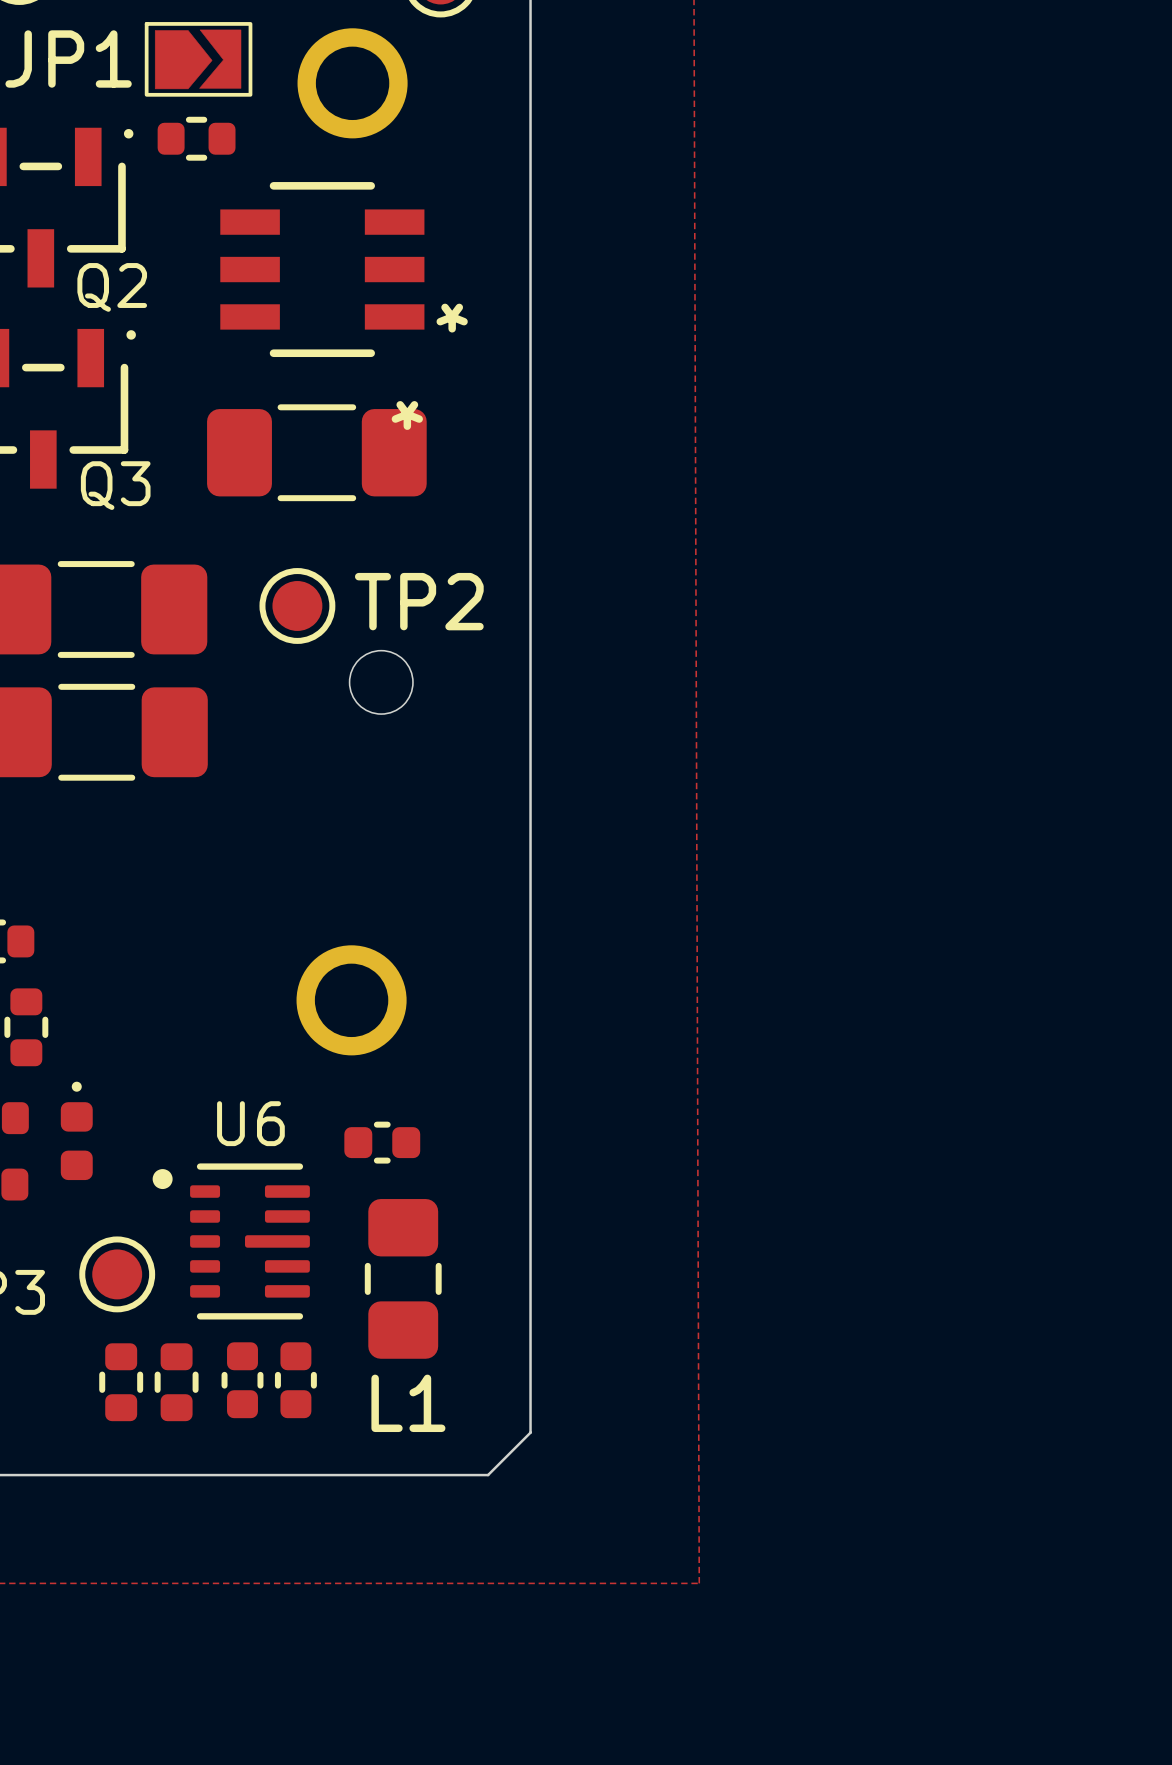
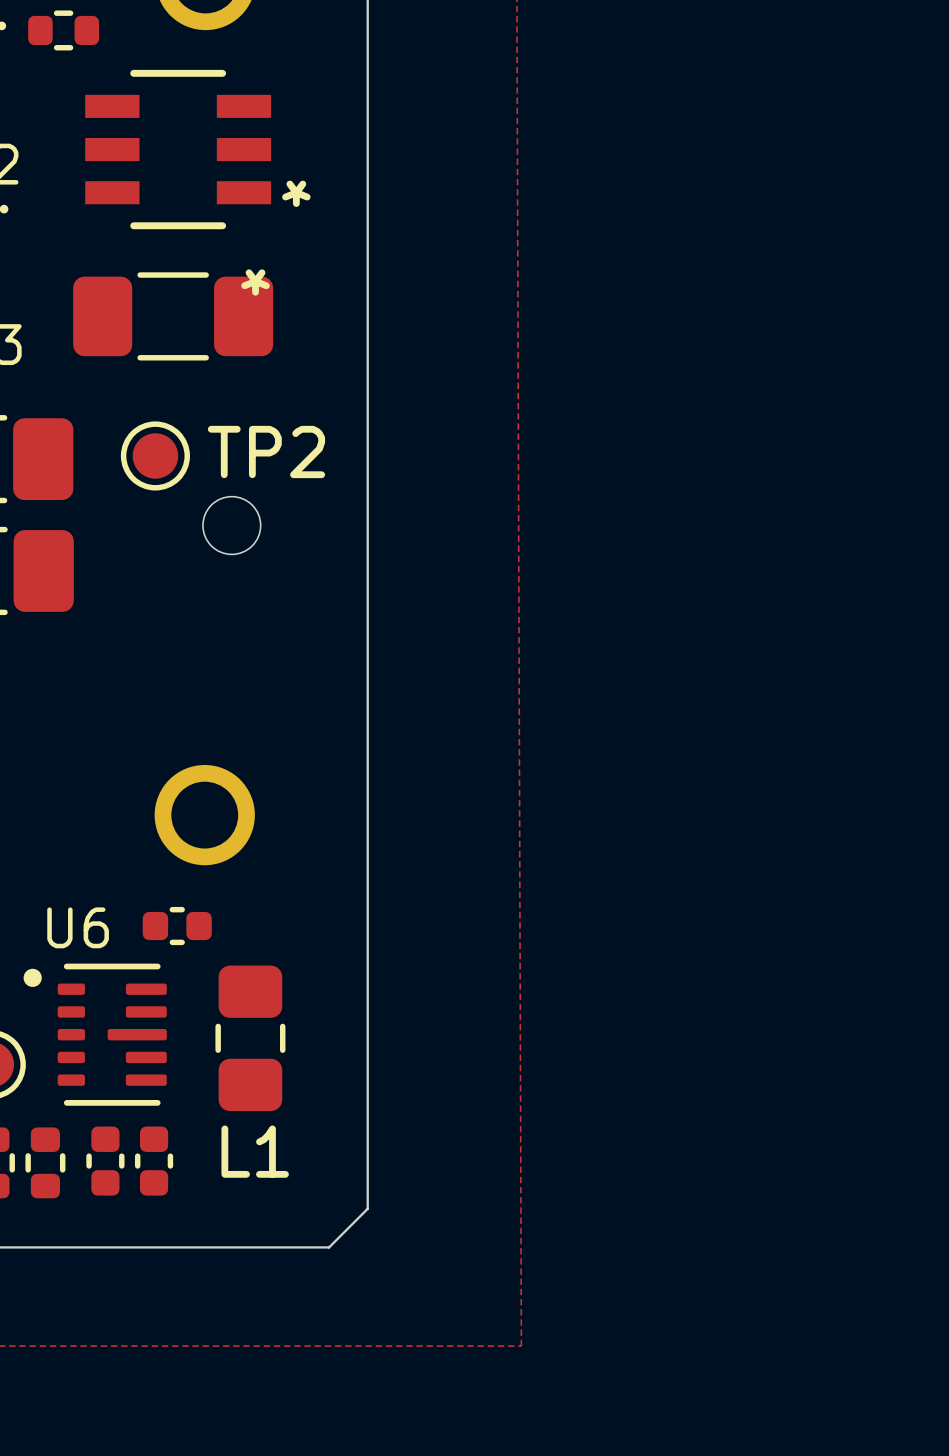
U6 name position: U6 (250, 1123) -> U6 (78, 927)
part position: (382, 1142) -> (177, 926)
L1 position: (403, 1278) -> (250, 1038)

